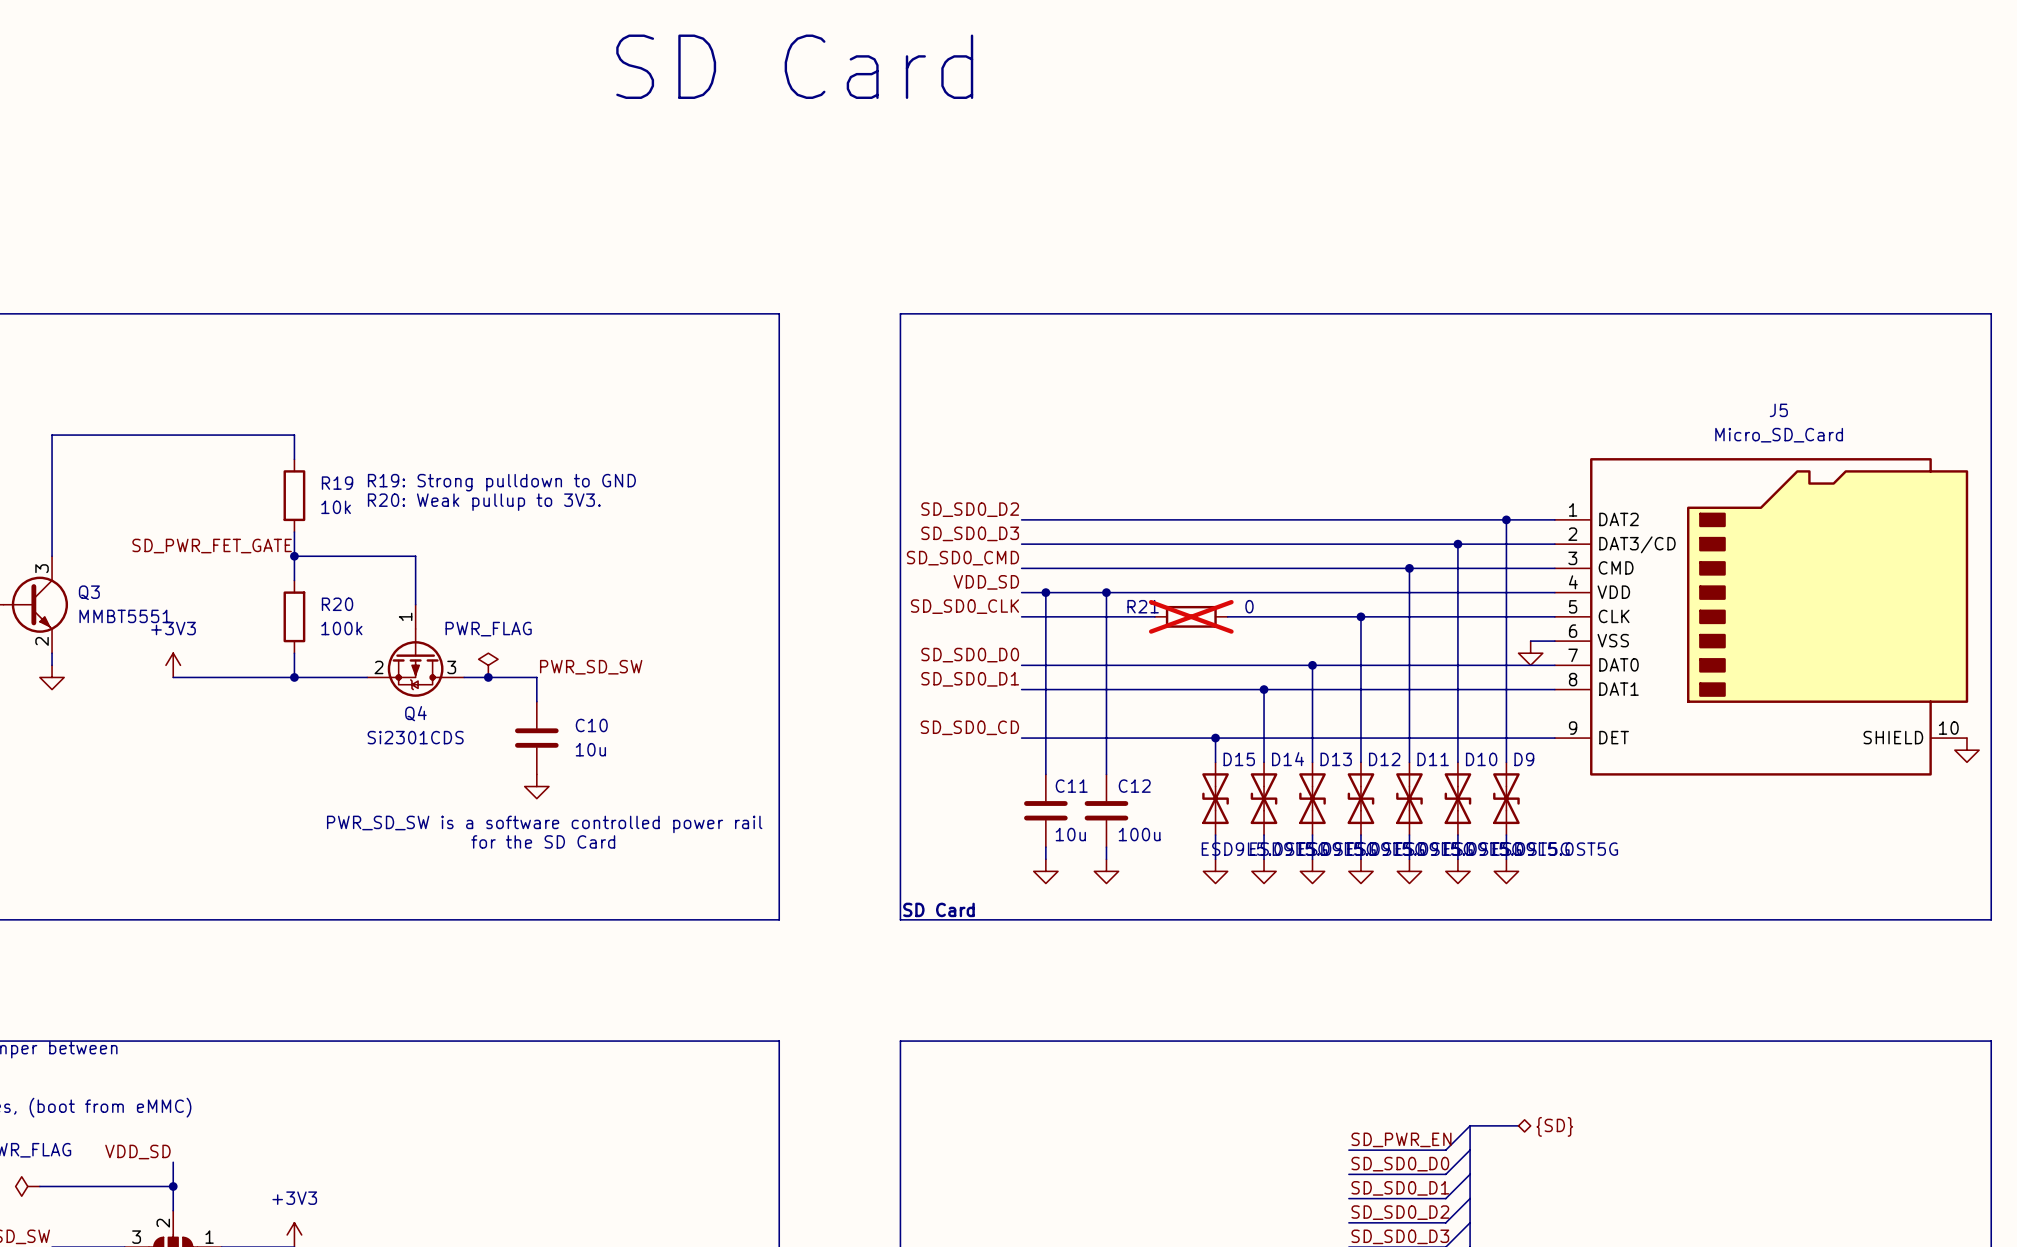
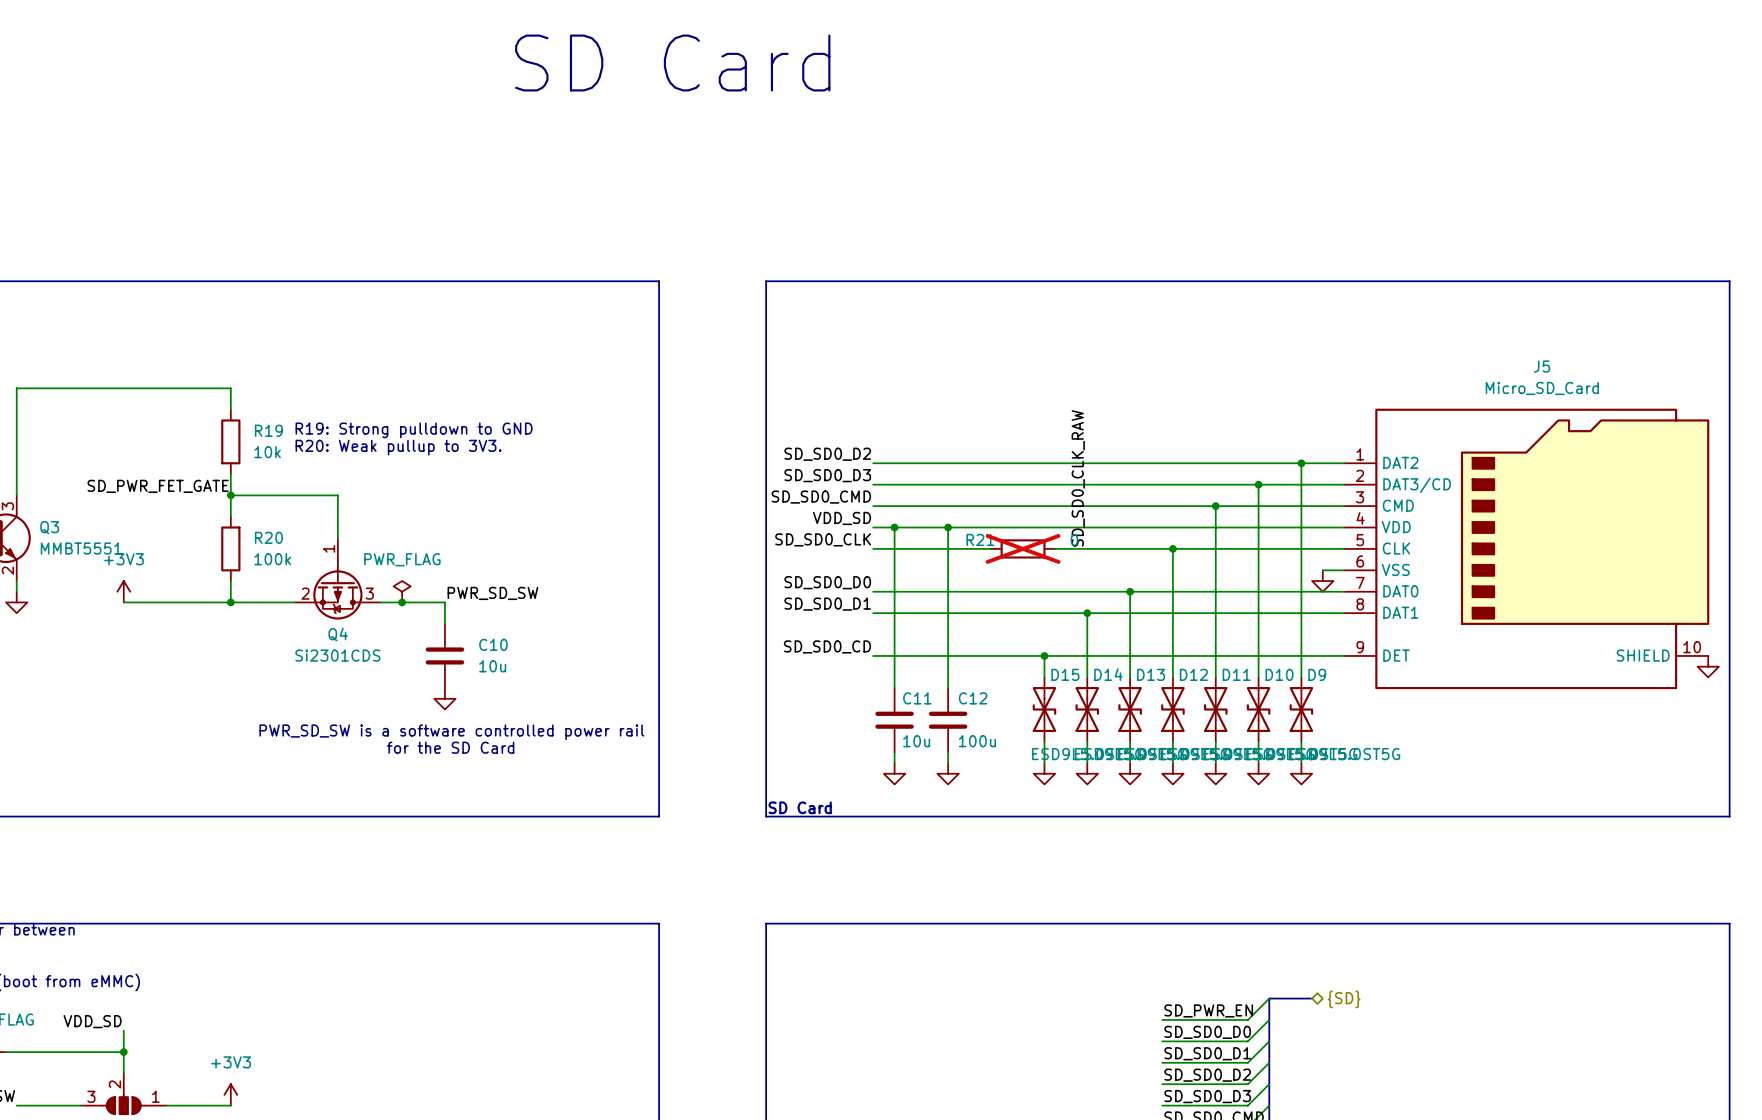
label: none -> SD_SD0_CLK_RAW (1078, 478)

